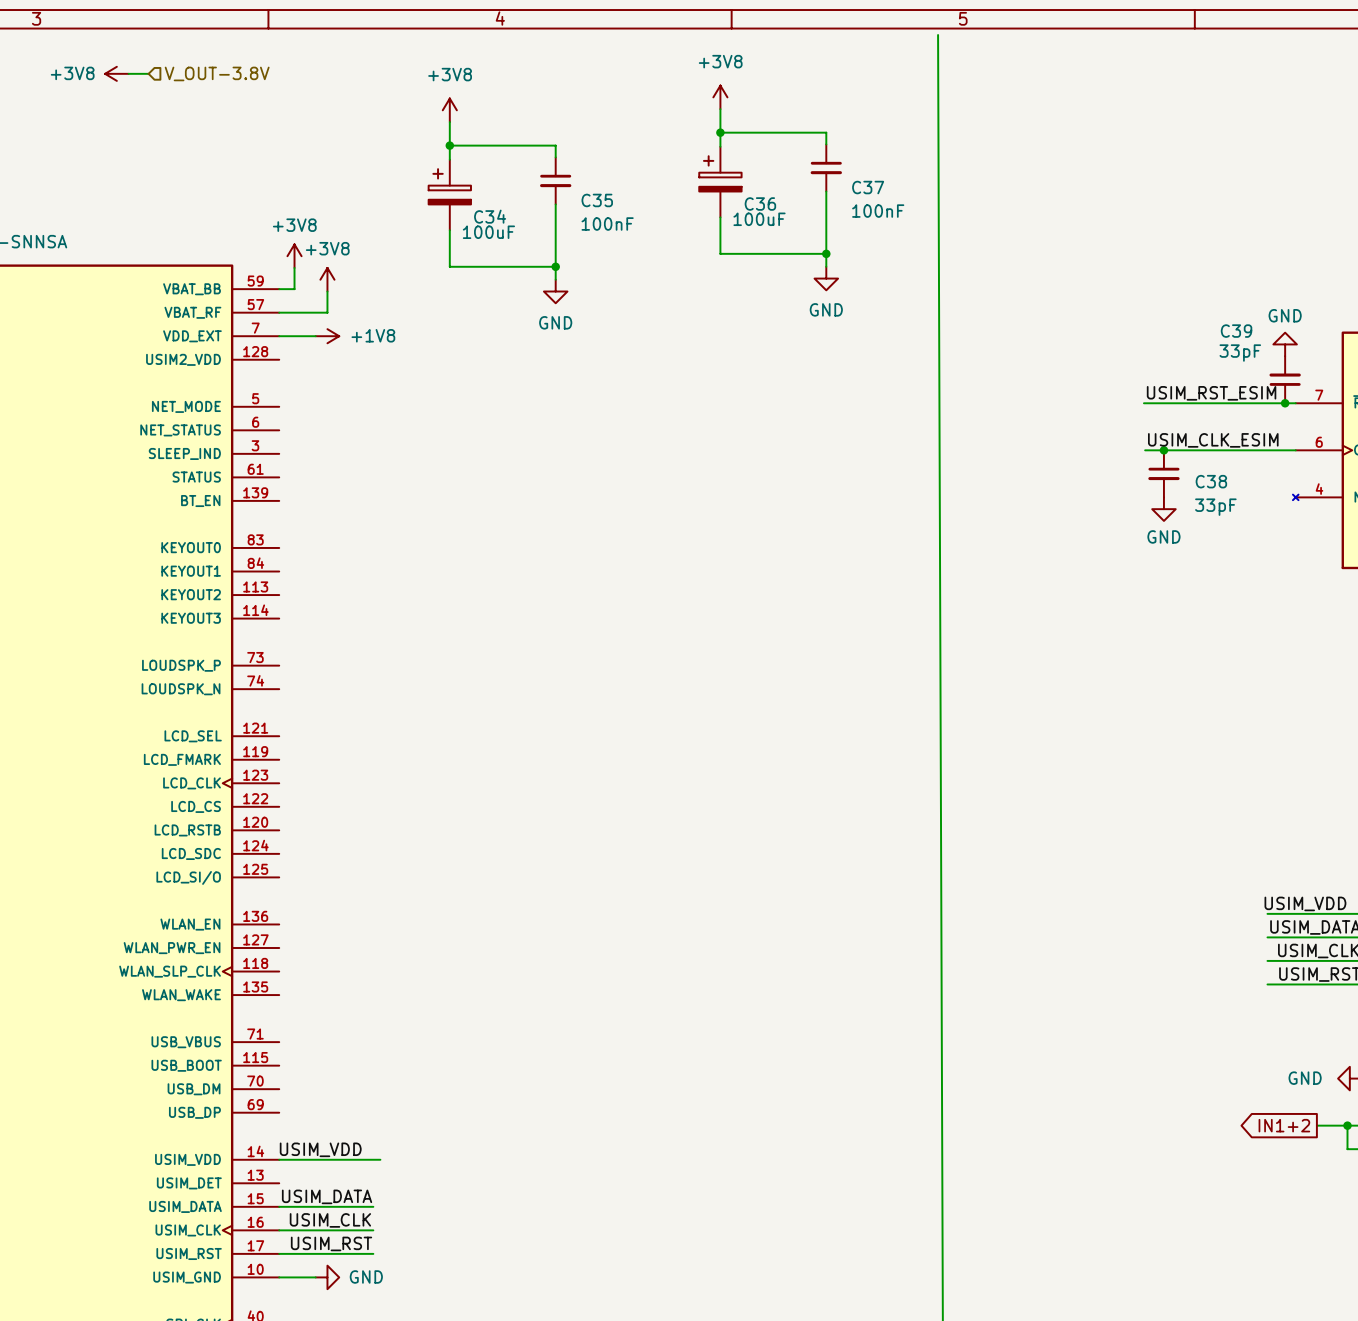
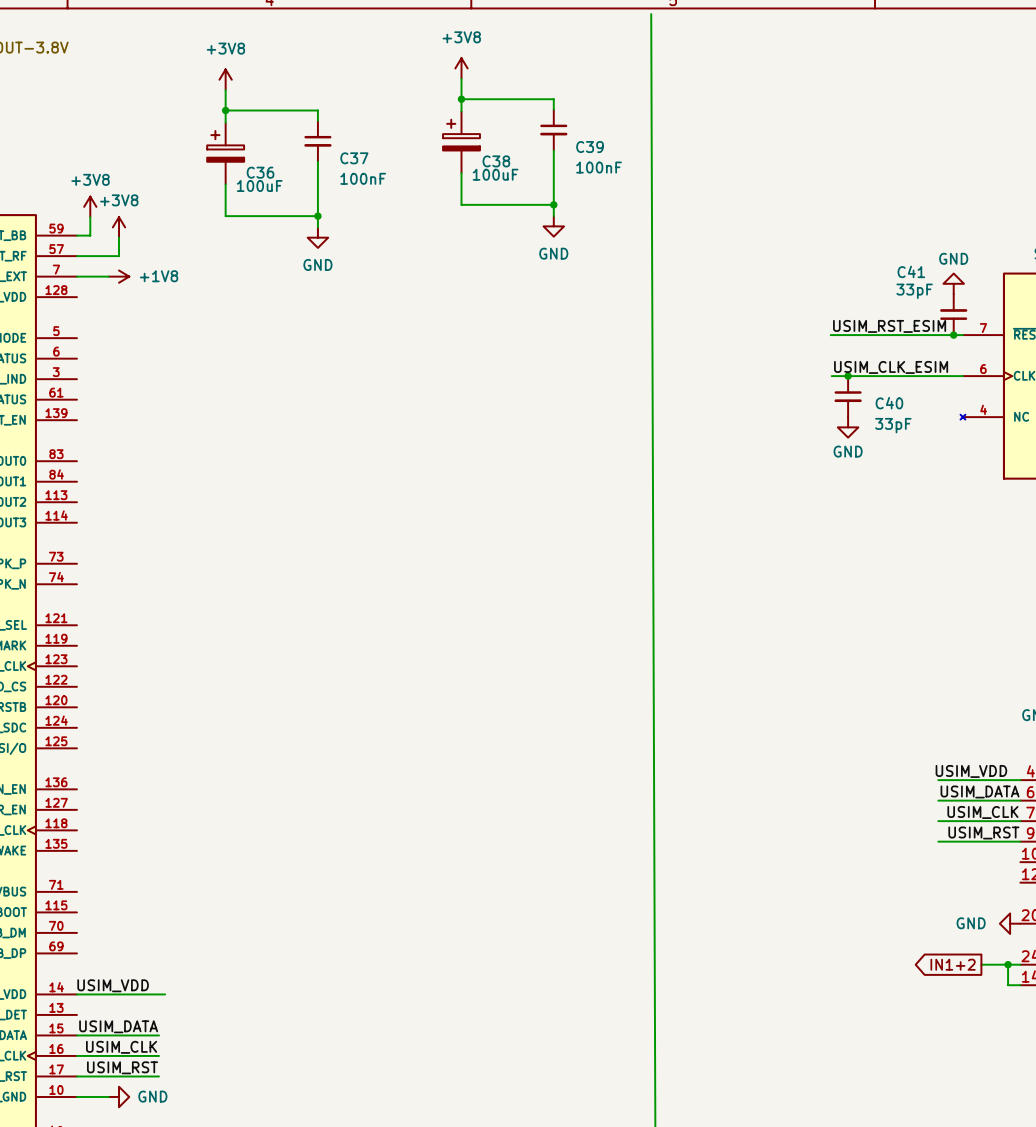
C37 name: C37 (868, 187) -> C39 (590, 147)
C35 name: C35 (597, 200) -> C37 (354, 158)
C36 name: C36 (760, 204) -> C38 (496, 161)
C34 name: C34 (490, 216) -> C36 (260, 172)
C39 name: C39 (1236, 331) -> C41 (911, 271)
C38 name: C38 (1211, 481) -> C40 (889, 403)

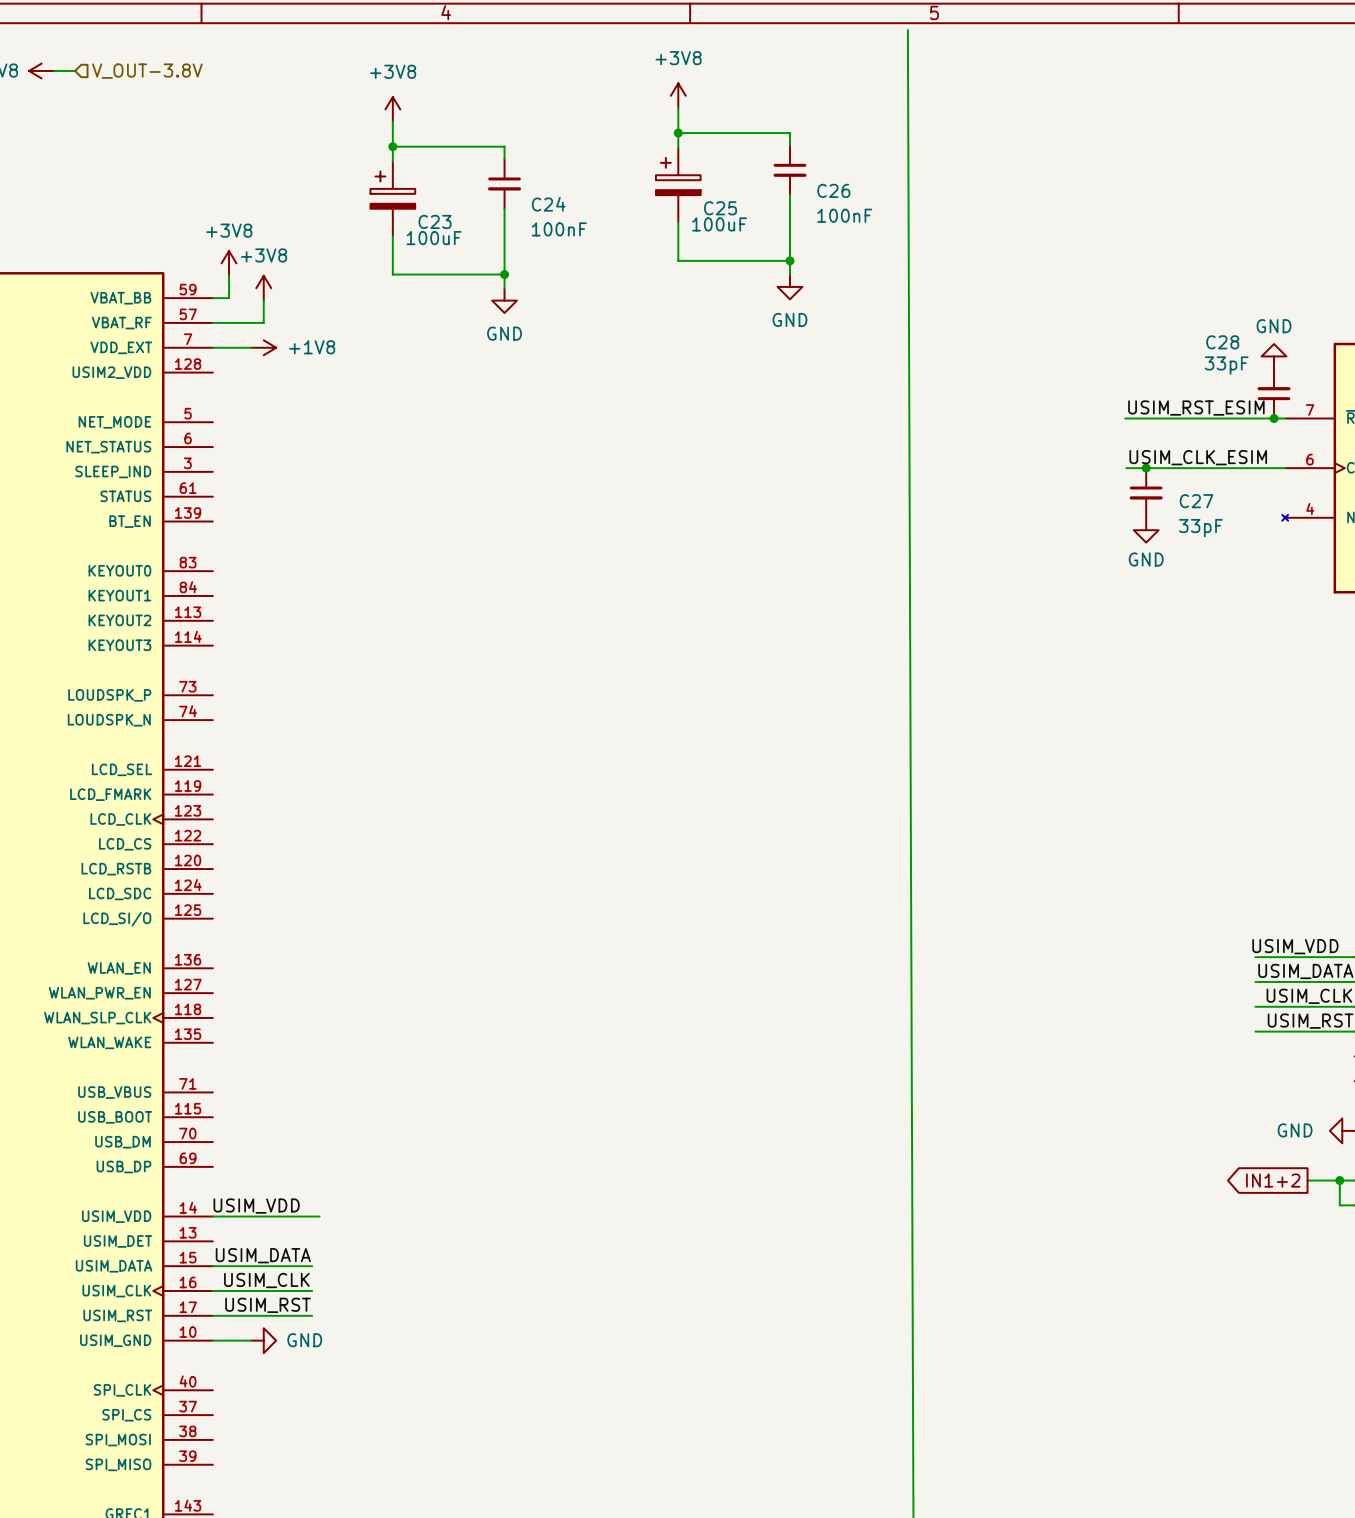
C39 name: C39 (590, 147) -> C26 (833, 190)
C37 name: C37 (354, 158) -> C24 (548, 204)
C38 name: C38 (496, 161) -> C25 (720, 208)
C36 name: C36 (260, 172) -> C23 (435, 221)
C41 name: C41 (911, 271) -> C28 (1222, 342)
C40 name: C40 (889, 403) -> C27 (1196, 501)

